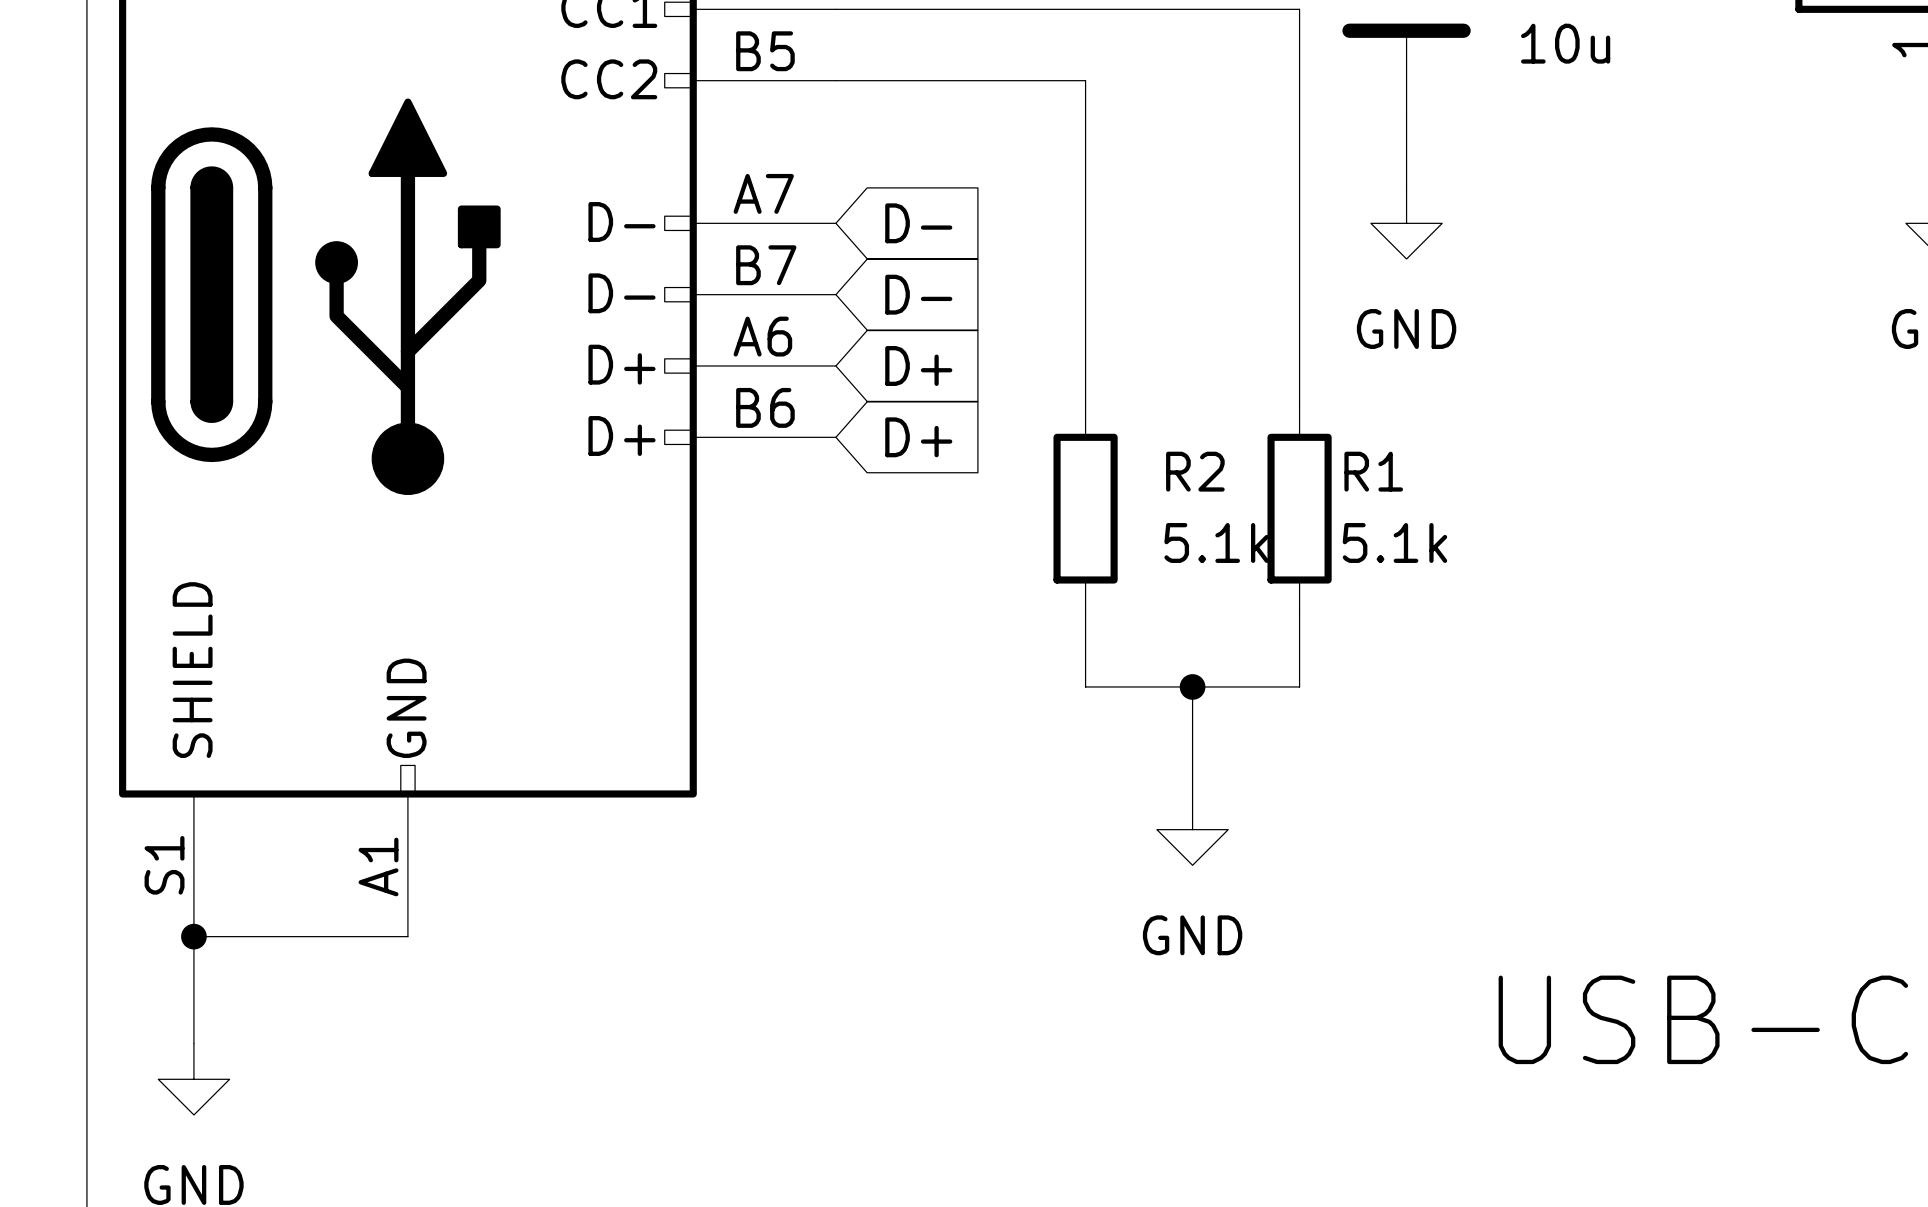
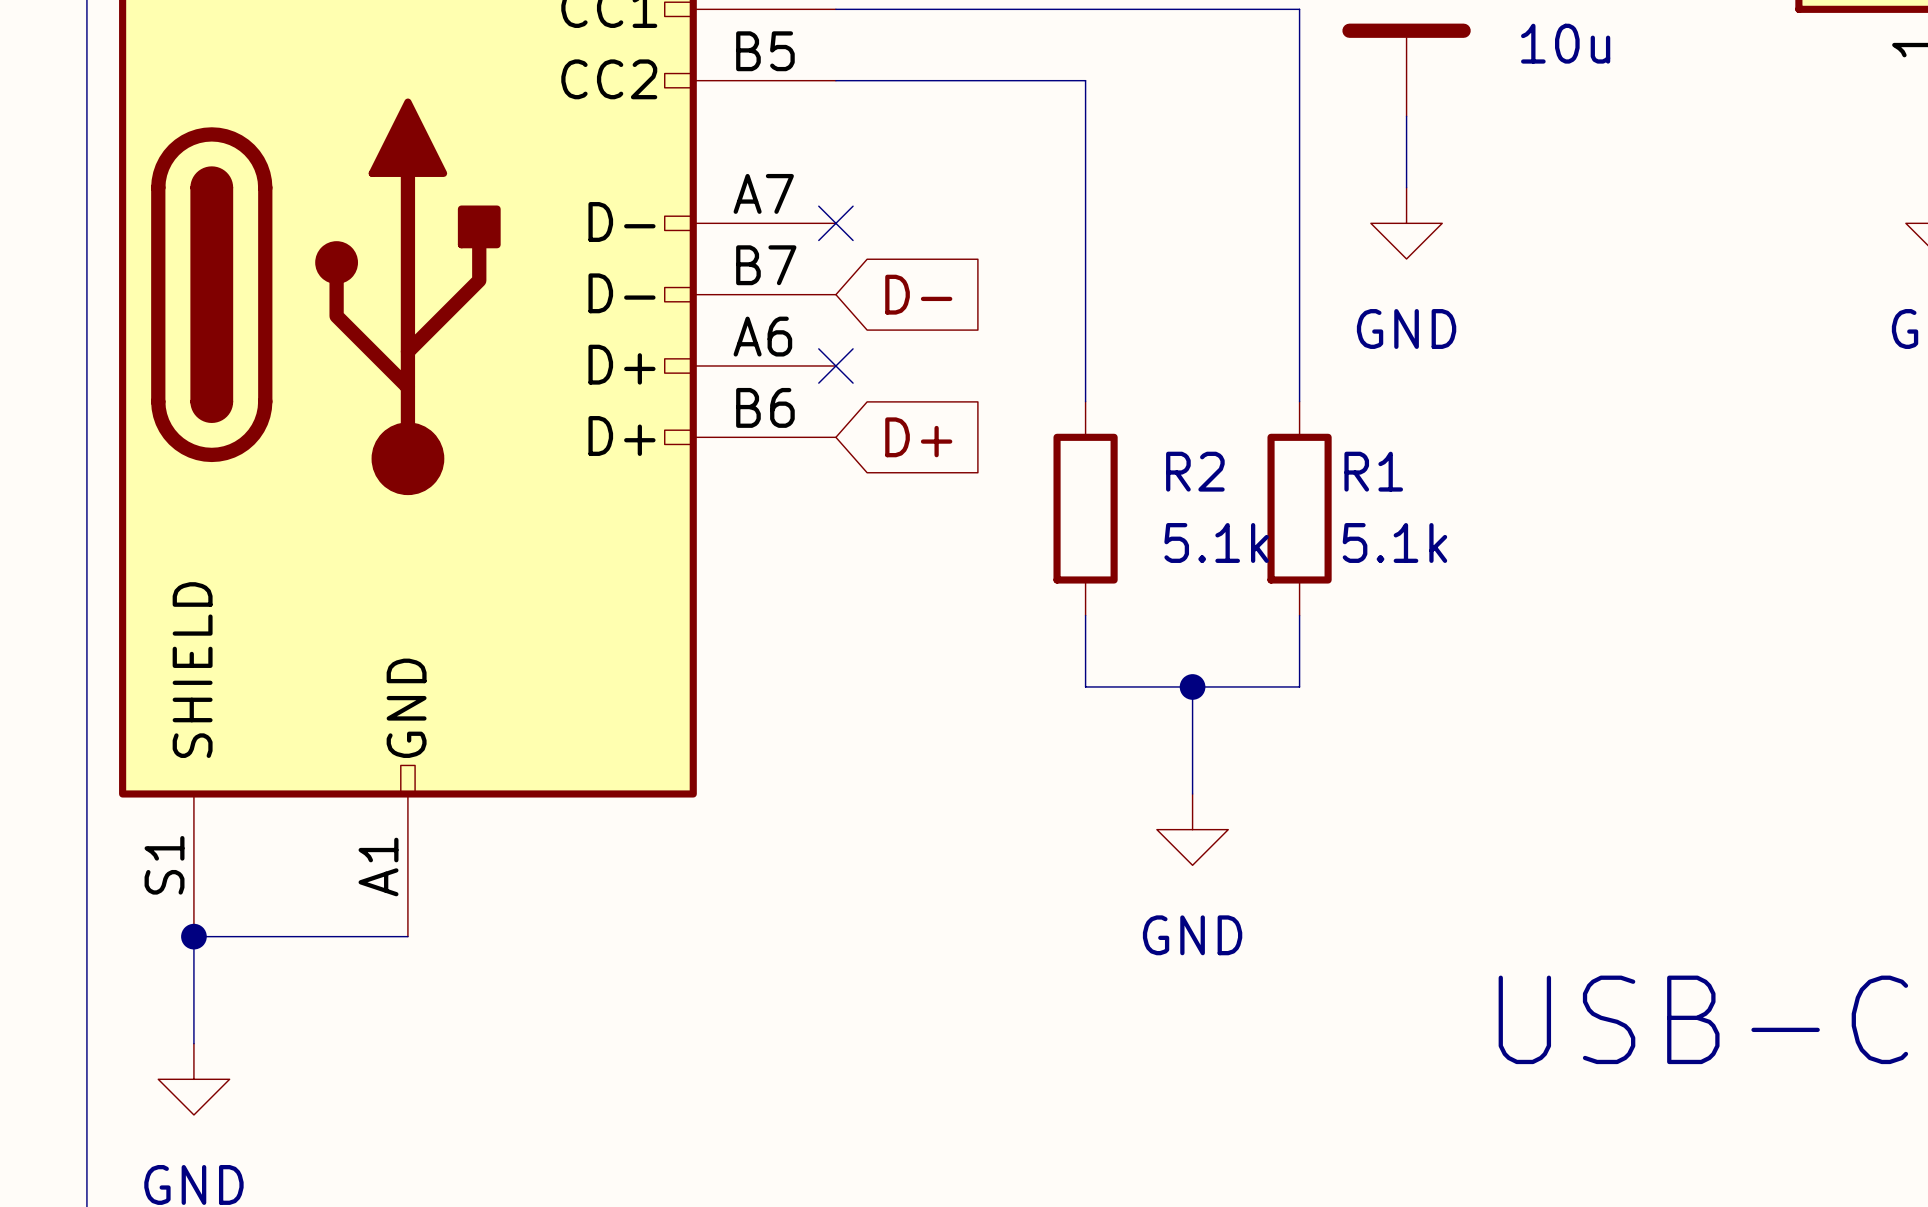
no-connect mark: none -> (835, 223)
global label: D- (918, 223) -> none
no-connect mark: none -> (835, 365)
global label: D+ (918, 365) -> none

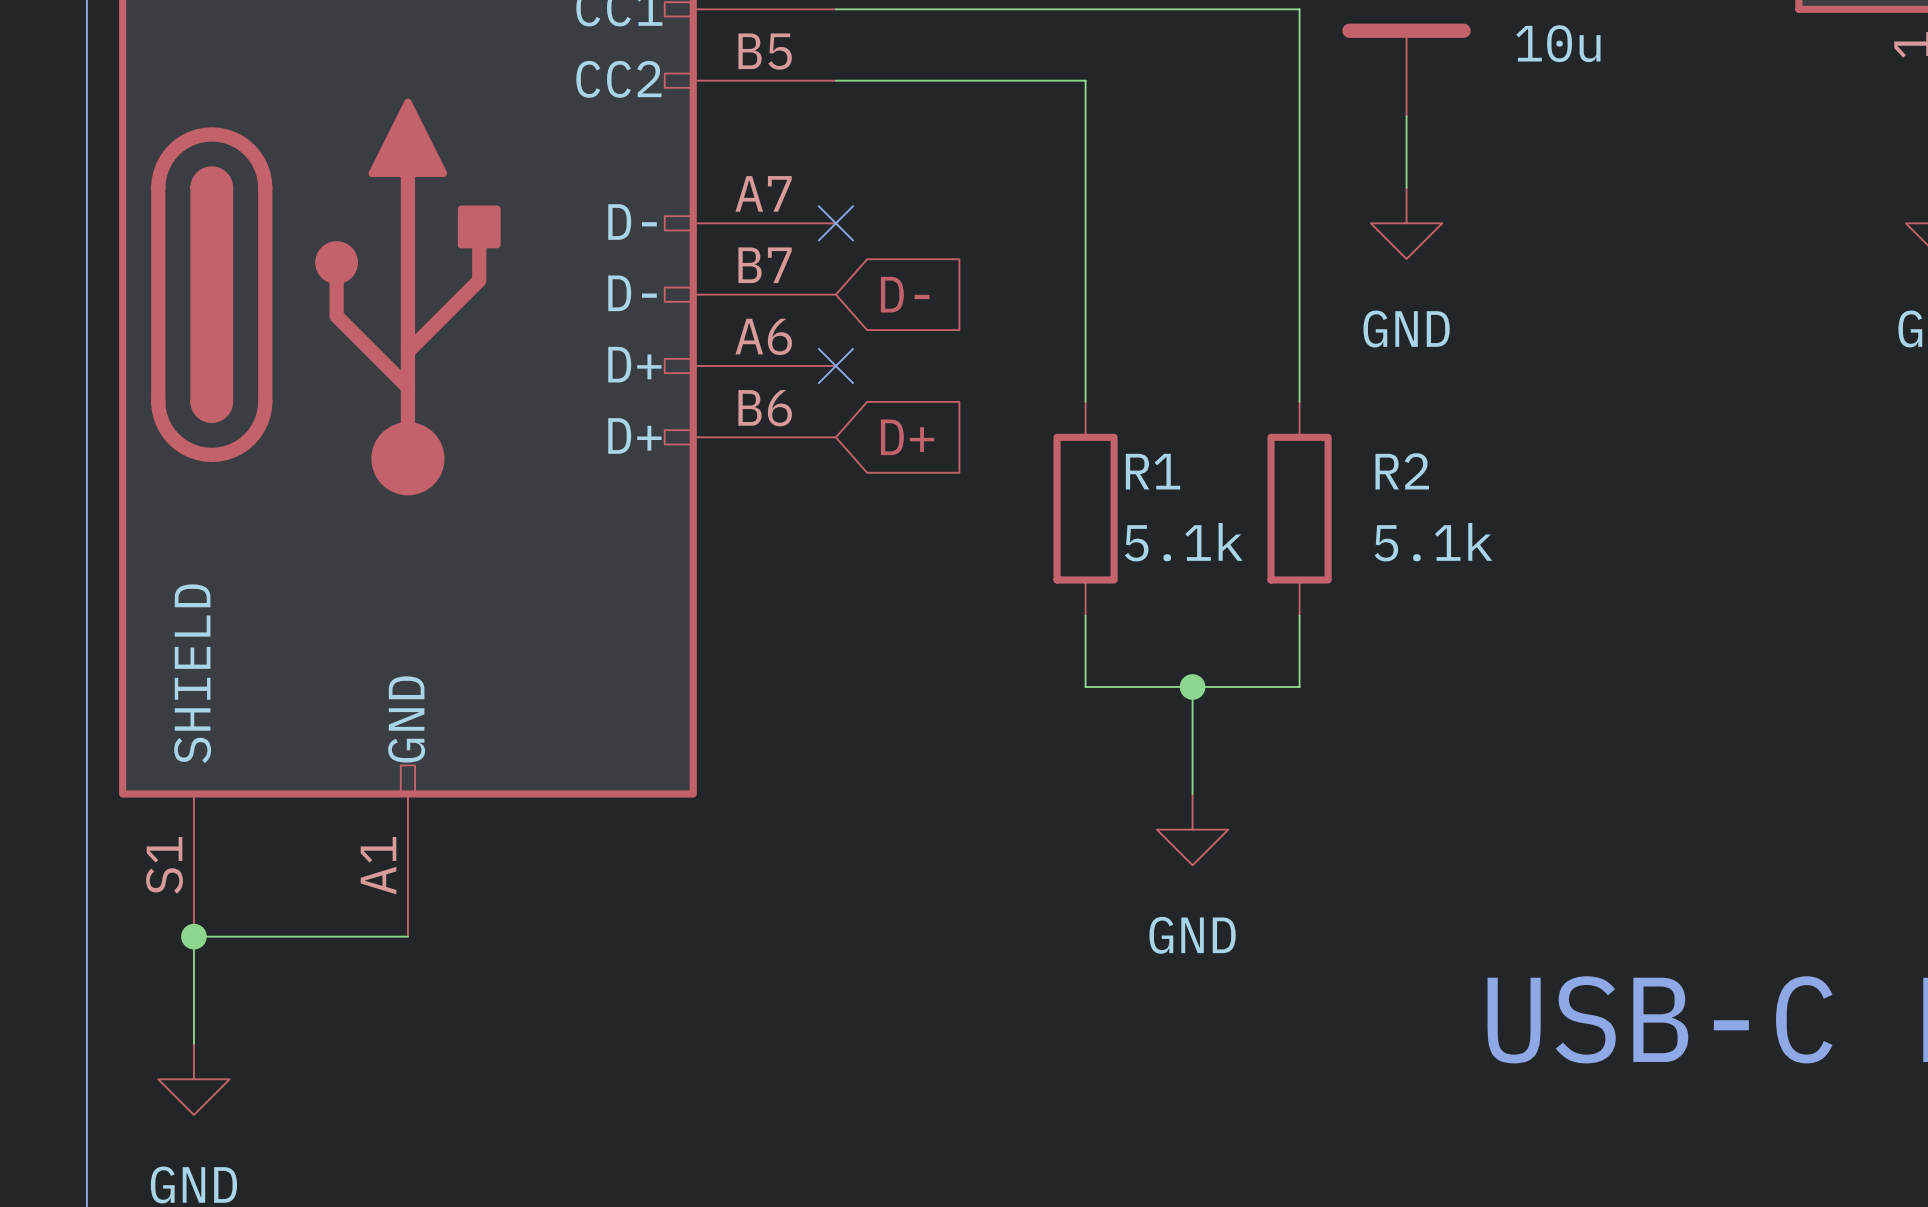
R2 name: R2 (1195, 471) -> R1 (1153, 471)
R1 name: R1 (1373, 471) -> R2 (1402, 471)
R2 value position: 5.1k (1216, 542) -> 5.1k (1183, 542)
R1 value position: 5.1k (1394, 542) -> 5.1k (1433, 542)

